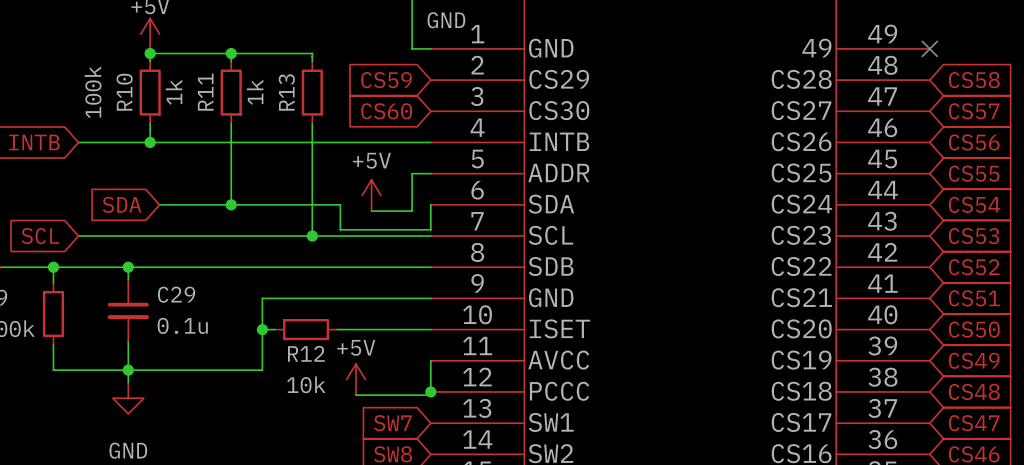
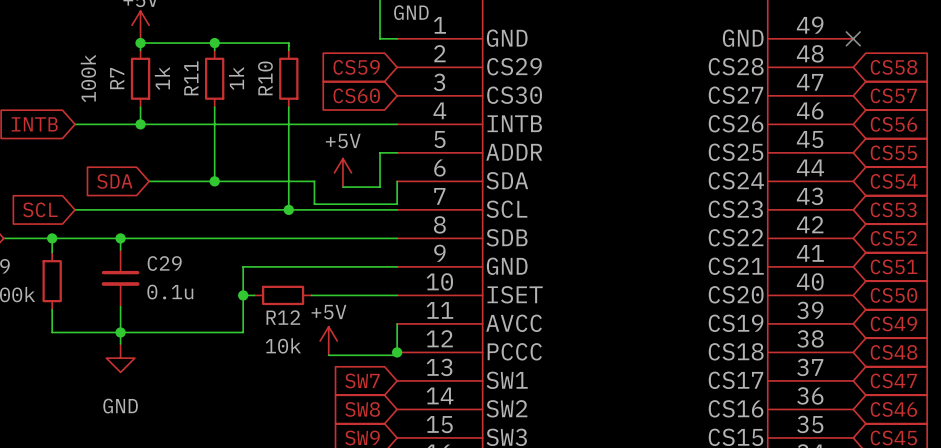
part pin name: 49 (816, 48) -> GND (743, 38)
R10 name: R10 (124, 92) -> R7 (117, 78)
R13 name: R13 (286, 92) -> R10 (265, 78)

